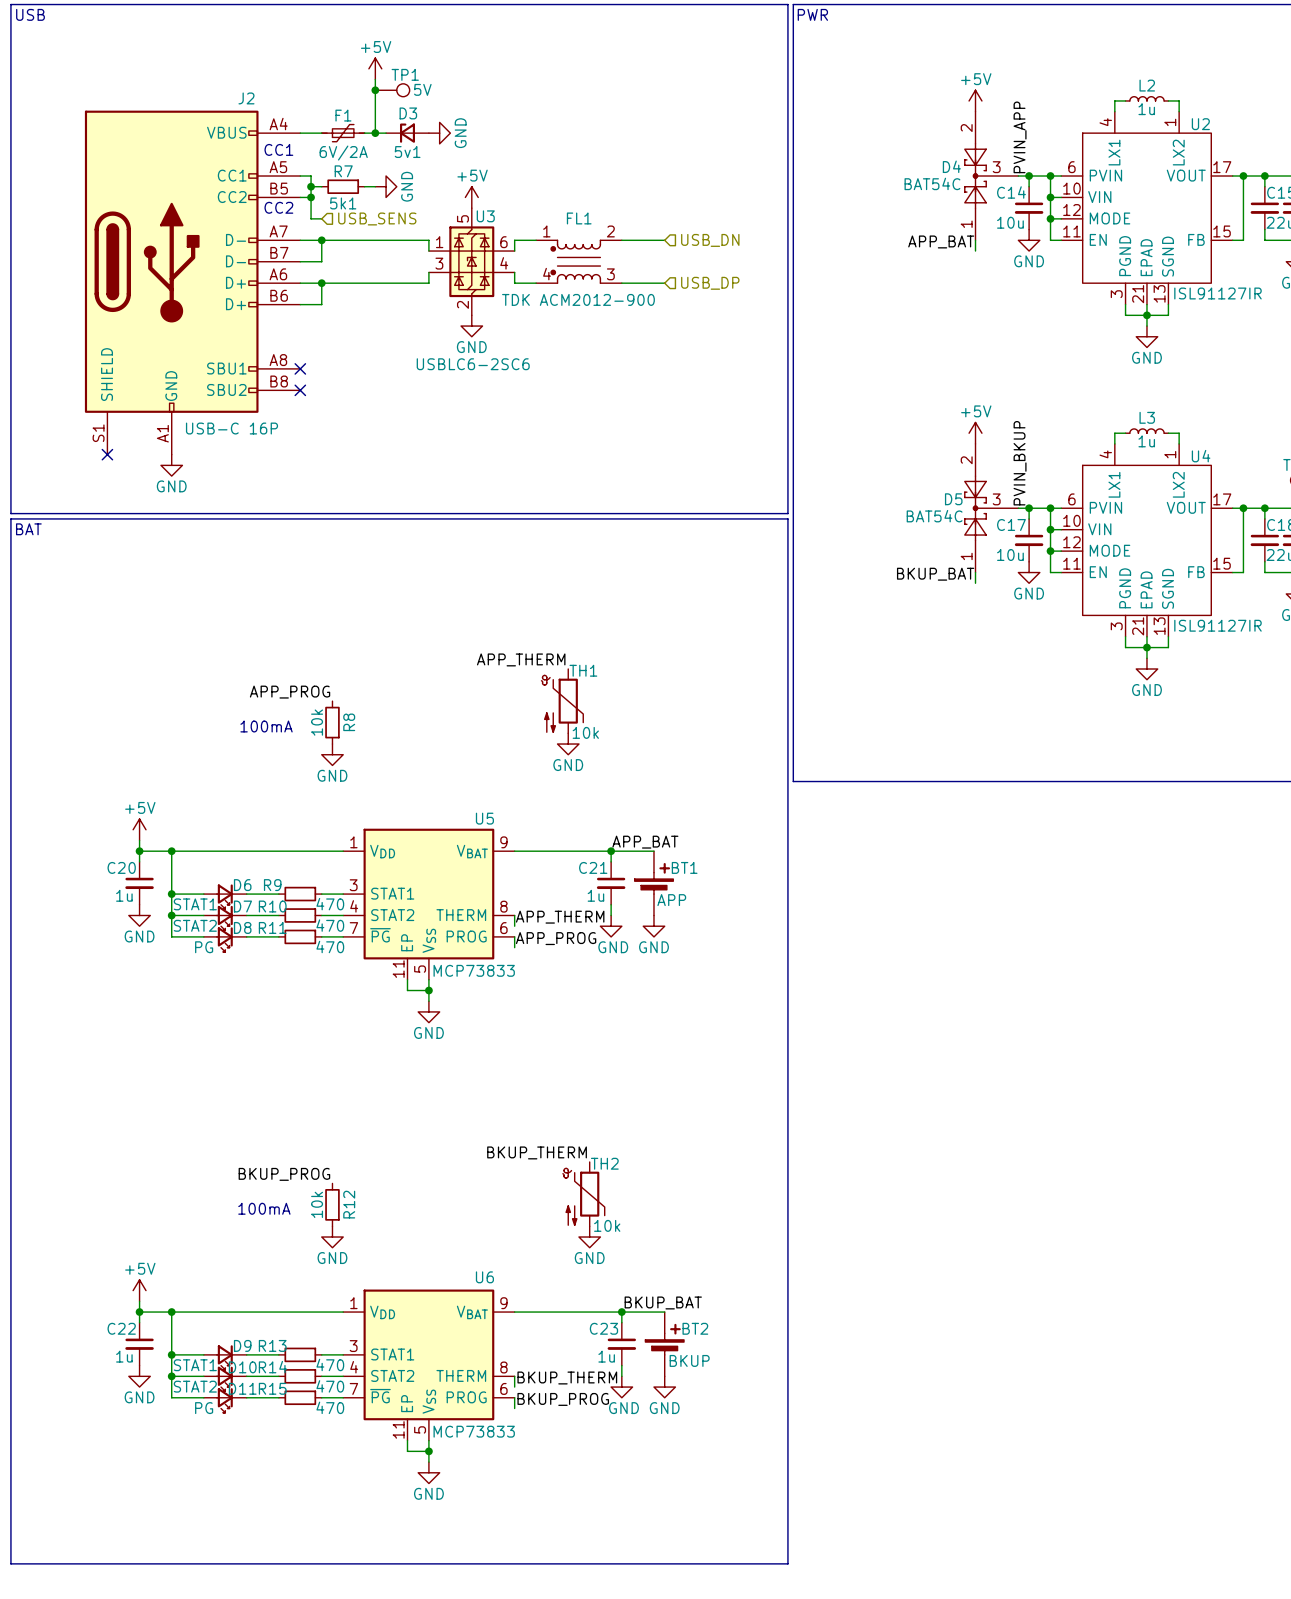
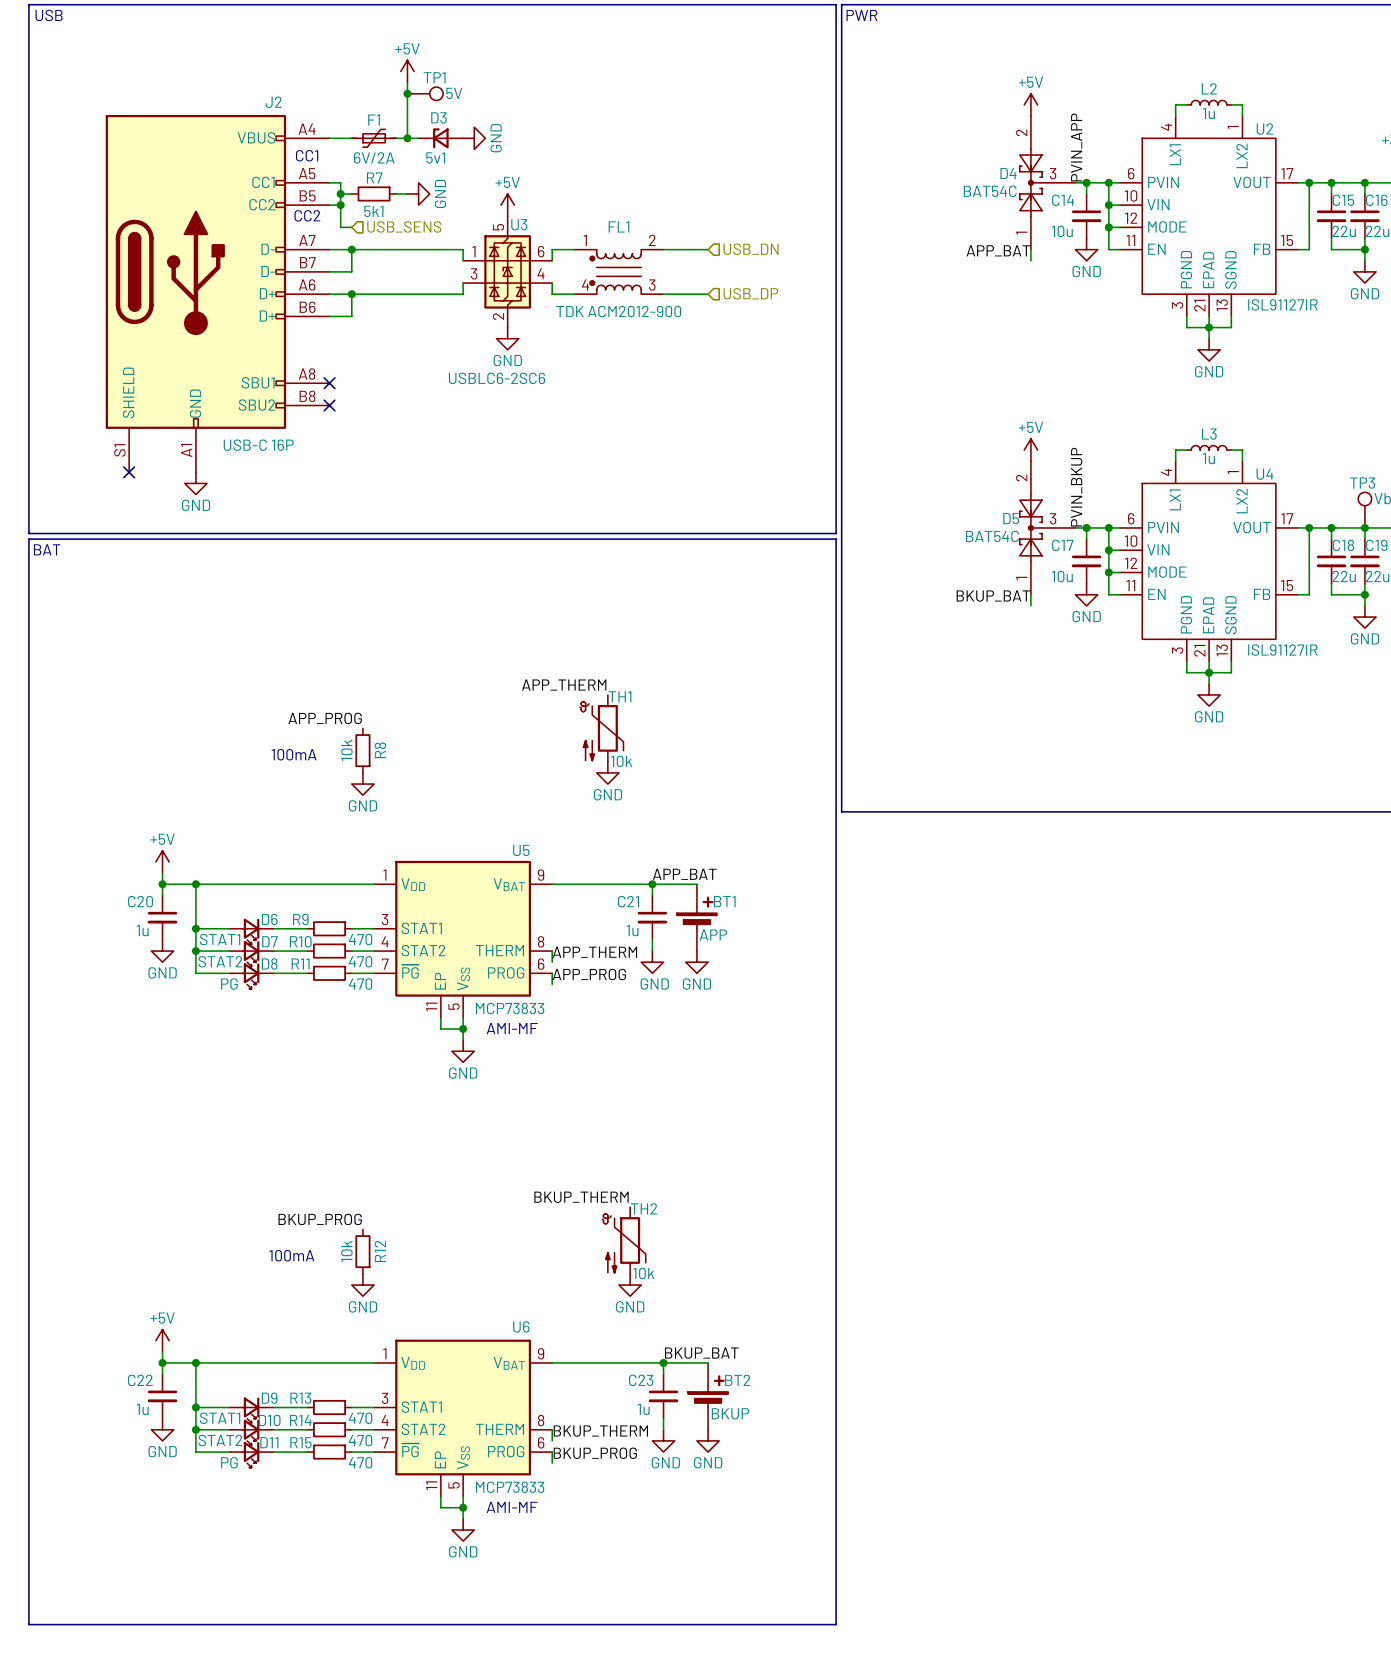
text: none -> AMI-MF (512, 1028)
text: none -> AMI-MF (512, 1507)

